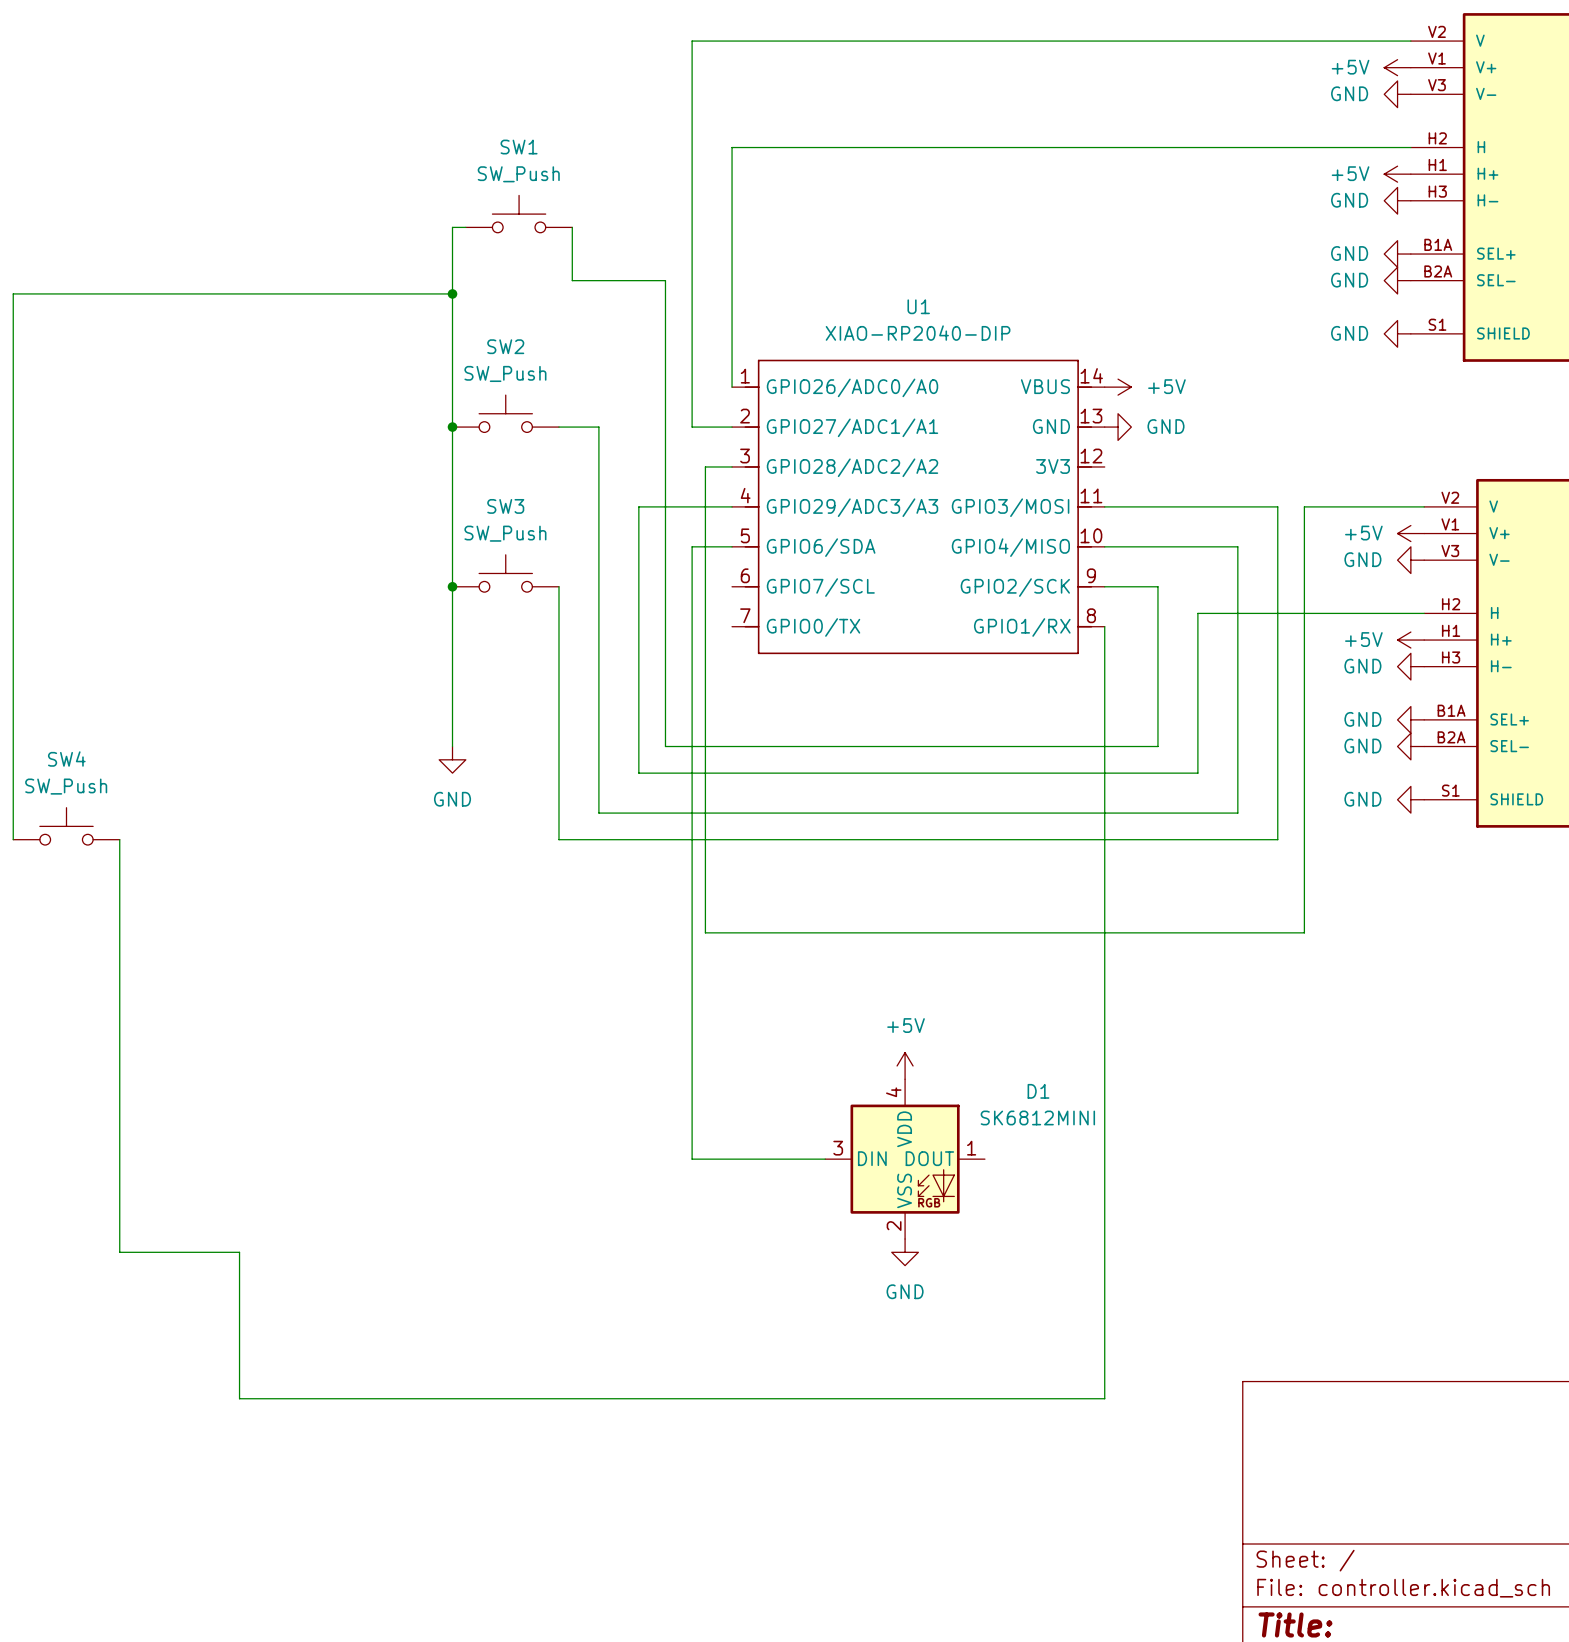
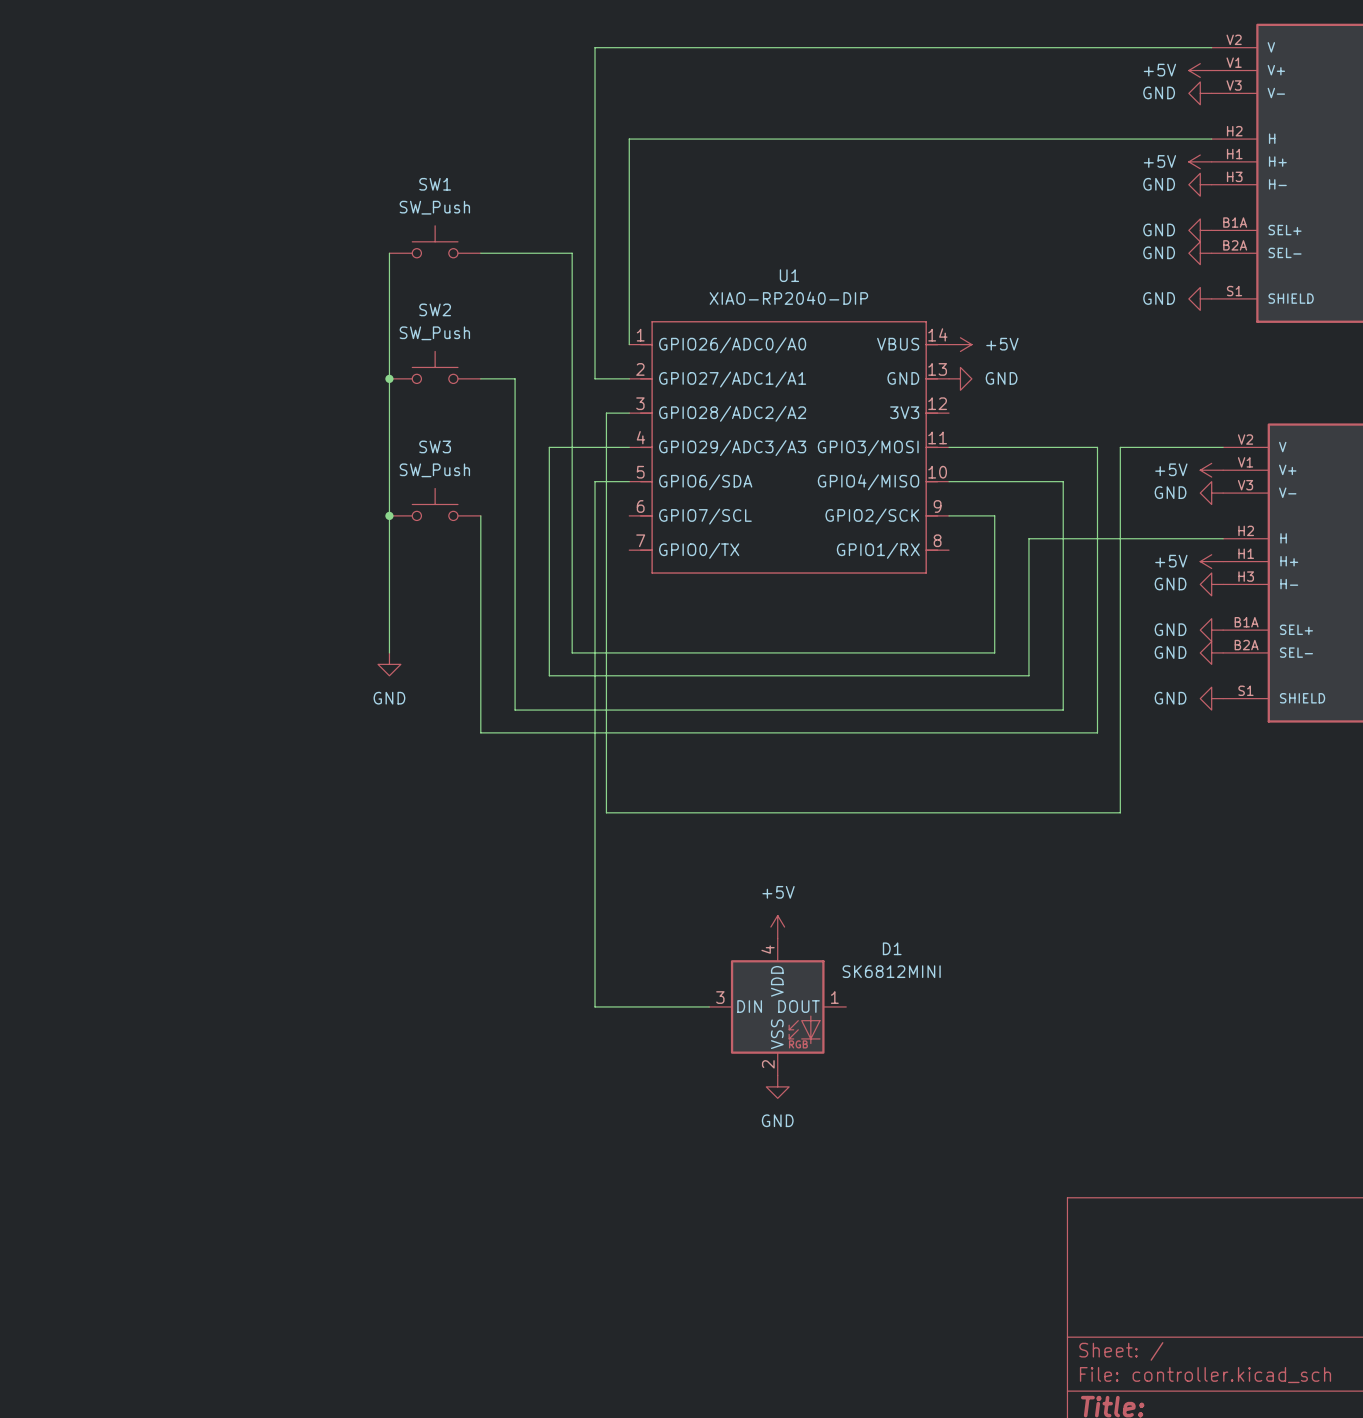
SW1 position: (519, 214) -> (435, 241)
wire: (465, 227) (452, 227) (452, 280) -> none
wire: (572, 227) (572, 280) -> (480, 253) (492, 253)
wire: (452, 293) (13, 293) (13, 839) -> none
junction: (452, 293) -> none
wire: (1104, 626) (1104, 1398) (239, 1398) (239, 1252) (119, 1252) (119, 839) -> none
SW4: SW_Push (66, 826) -> none

